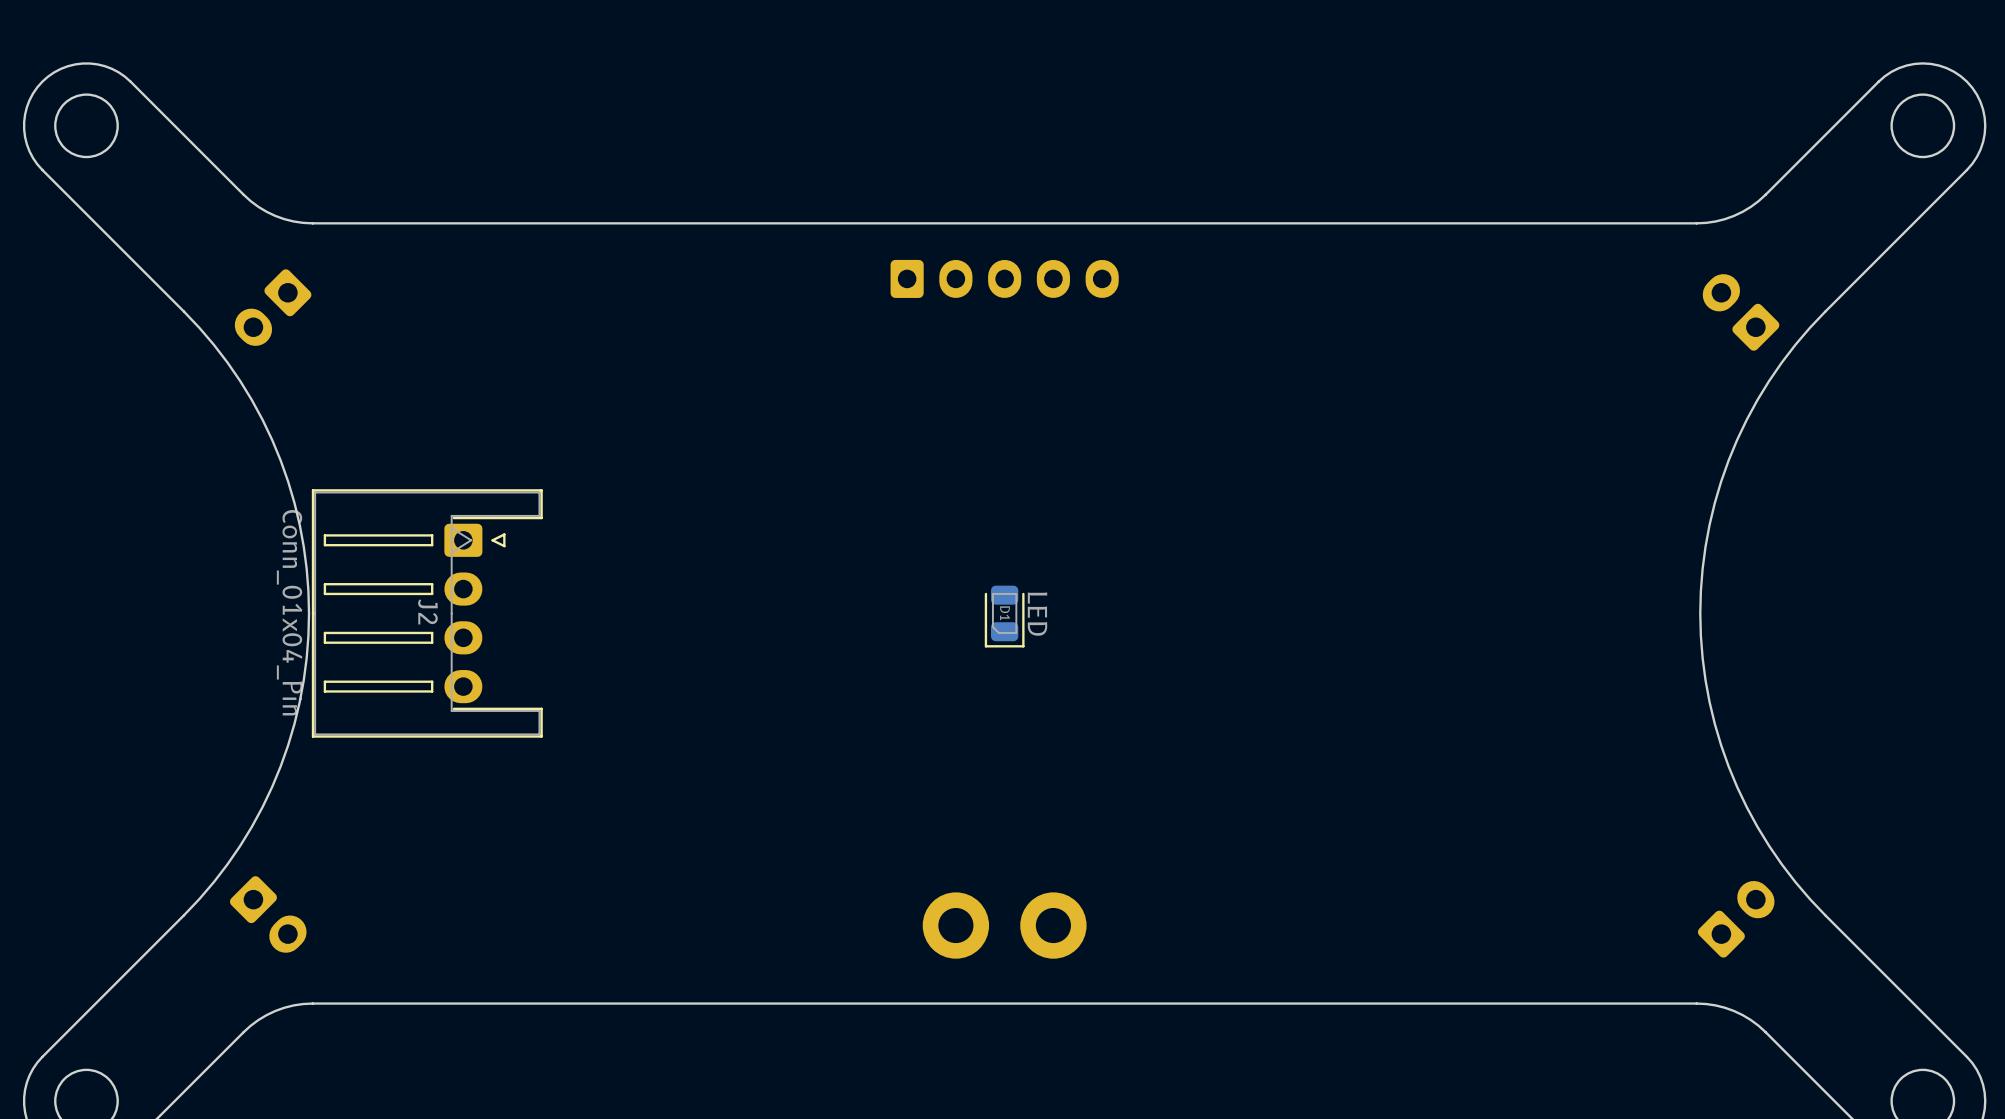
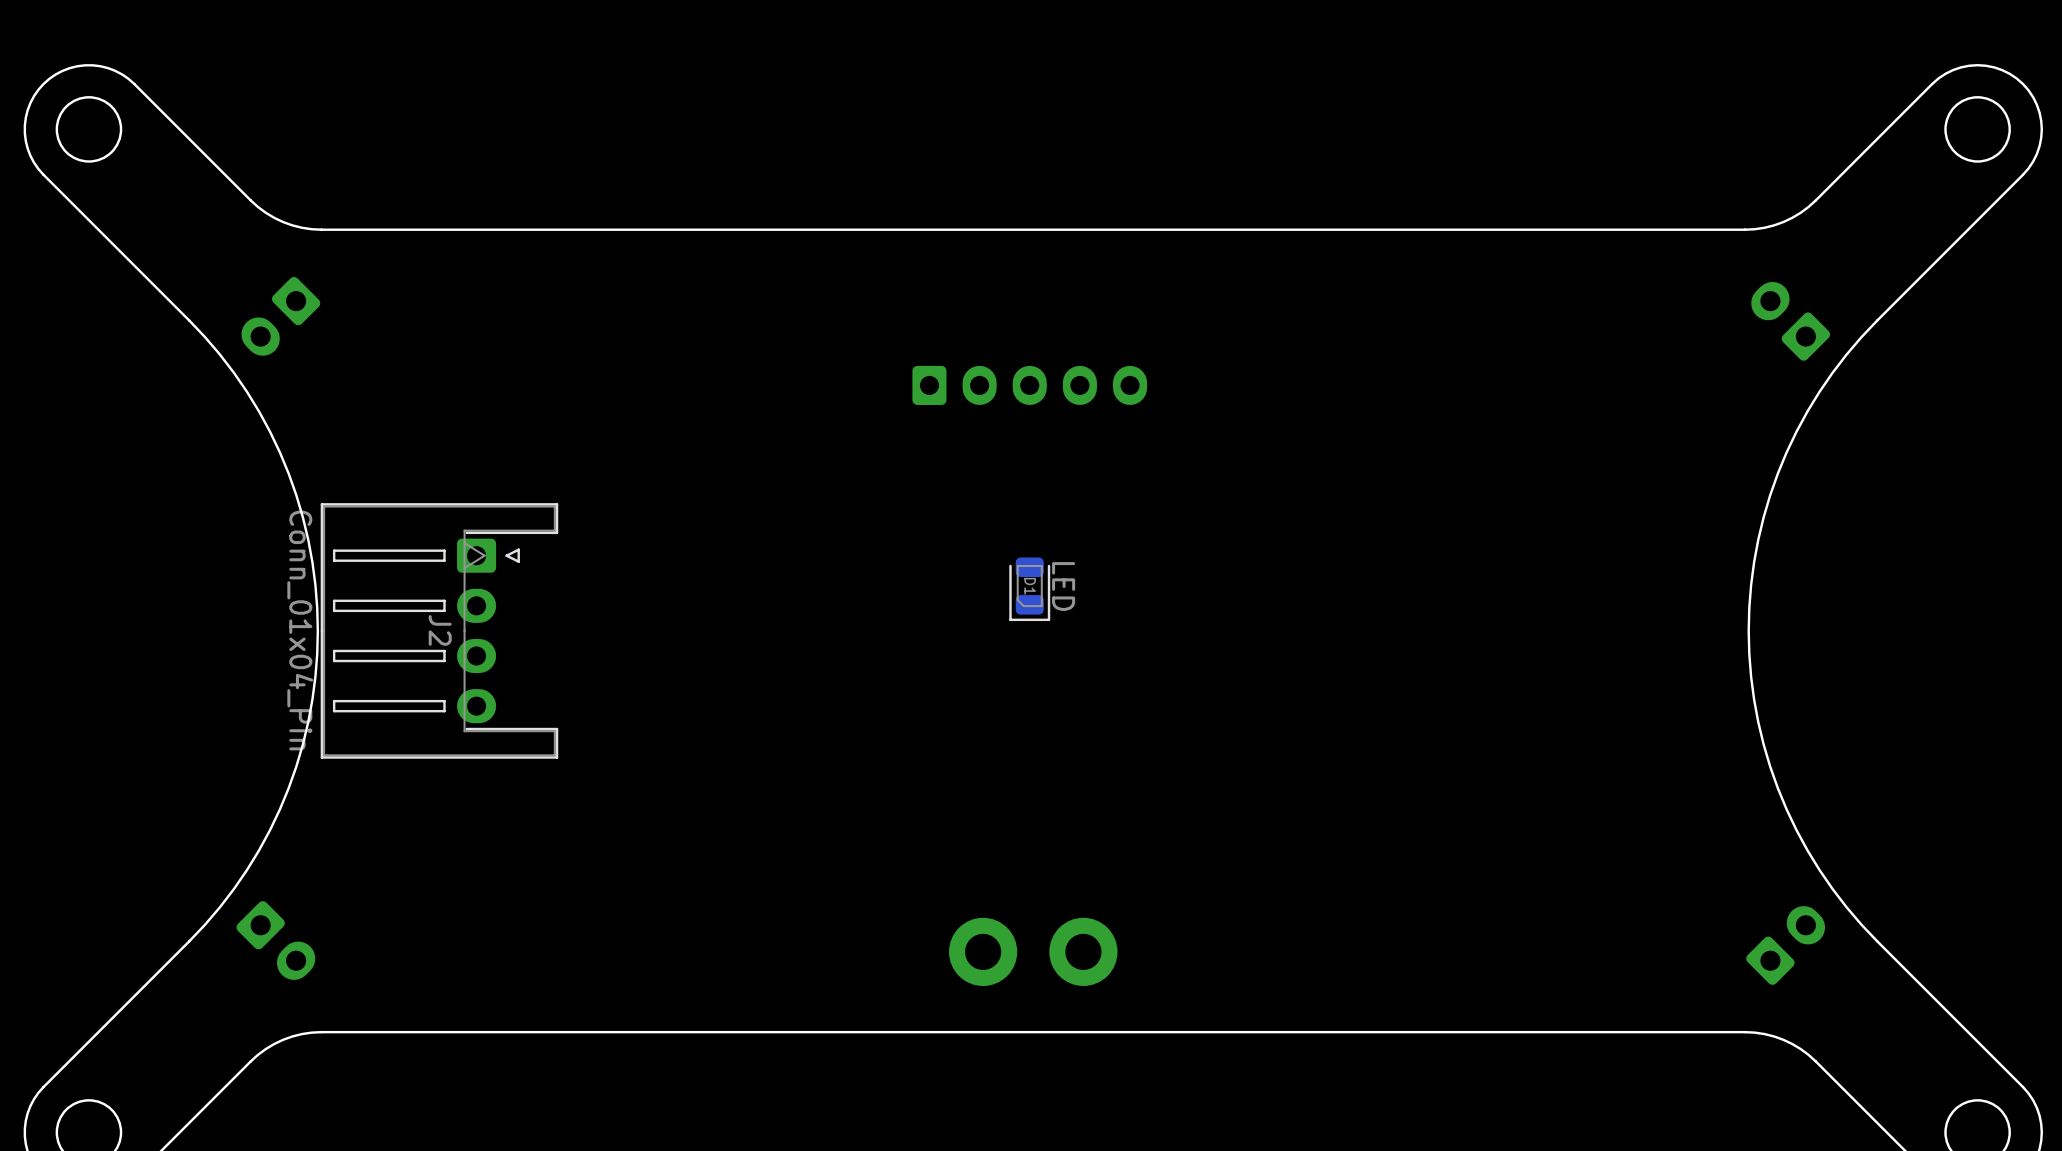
part position: (1004, 278) -> (1029, 385)
D1 position: (1004, 616) -> (1029, 589)

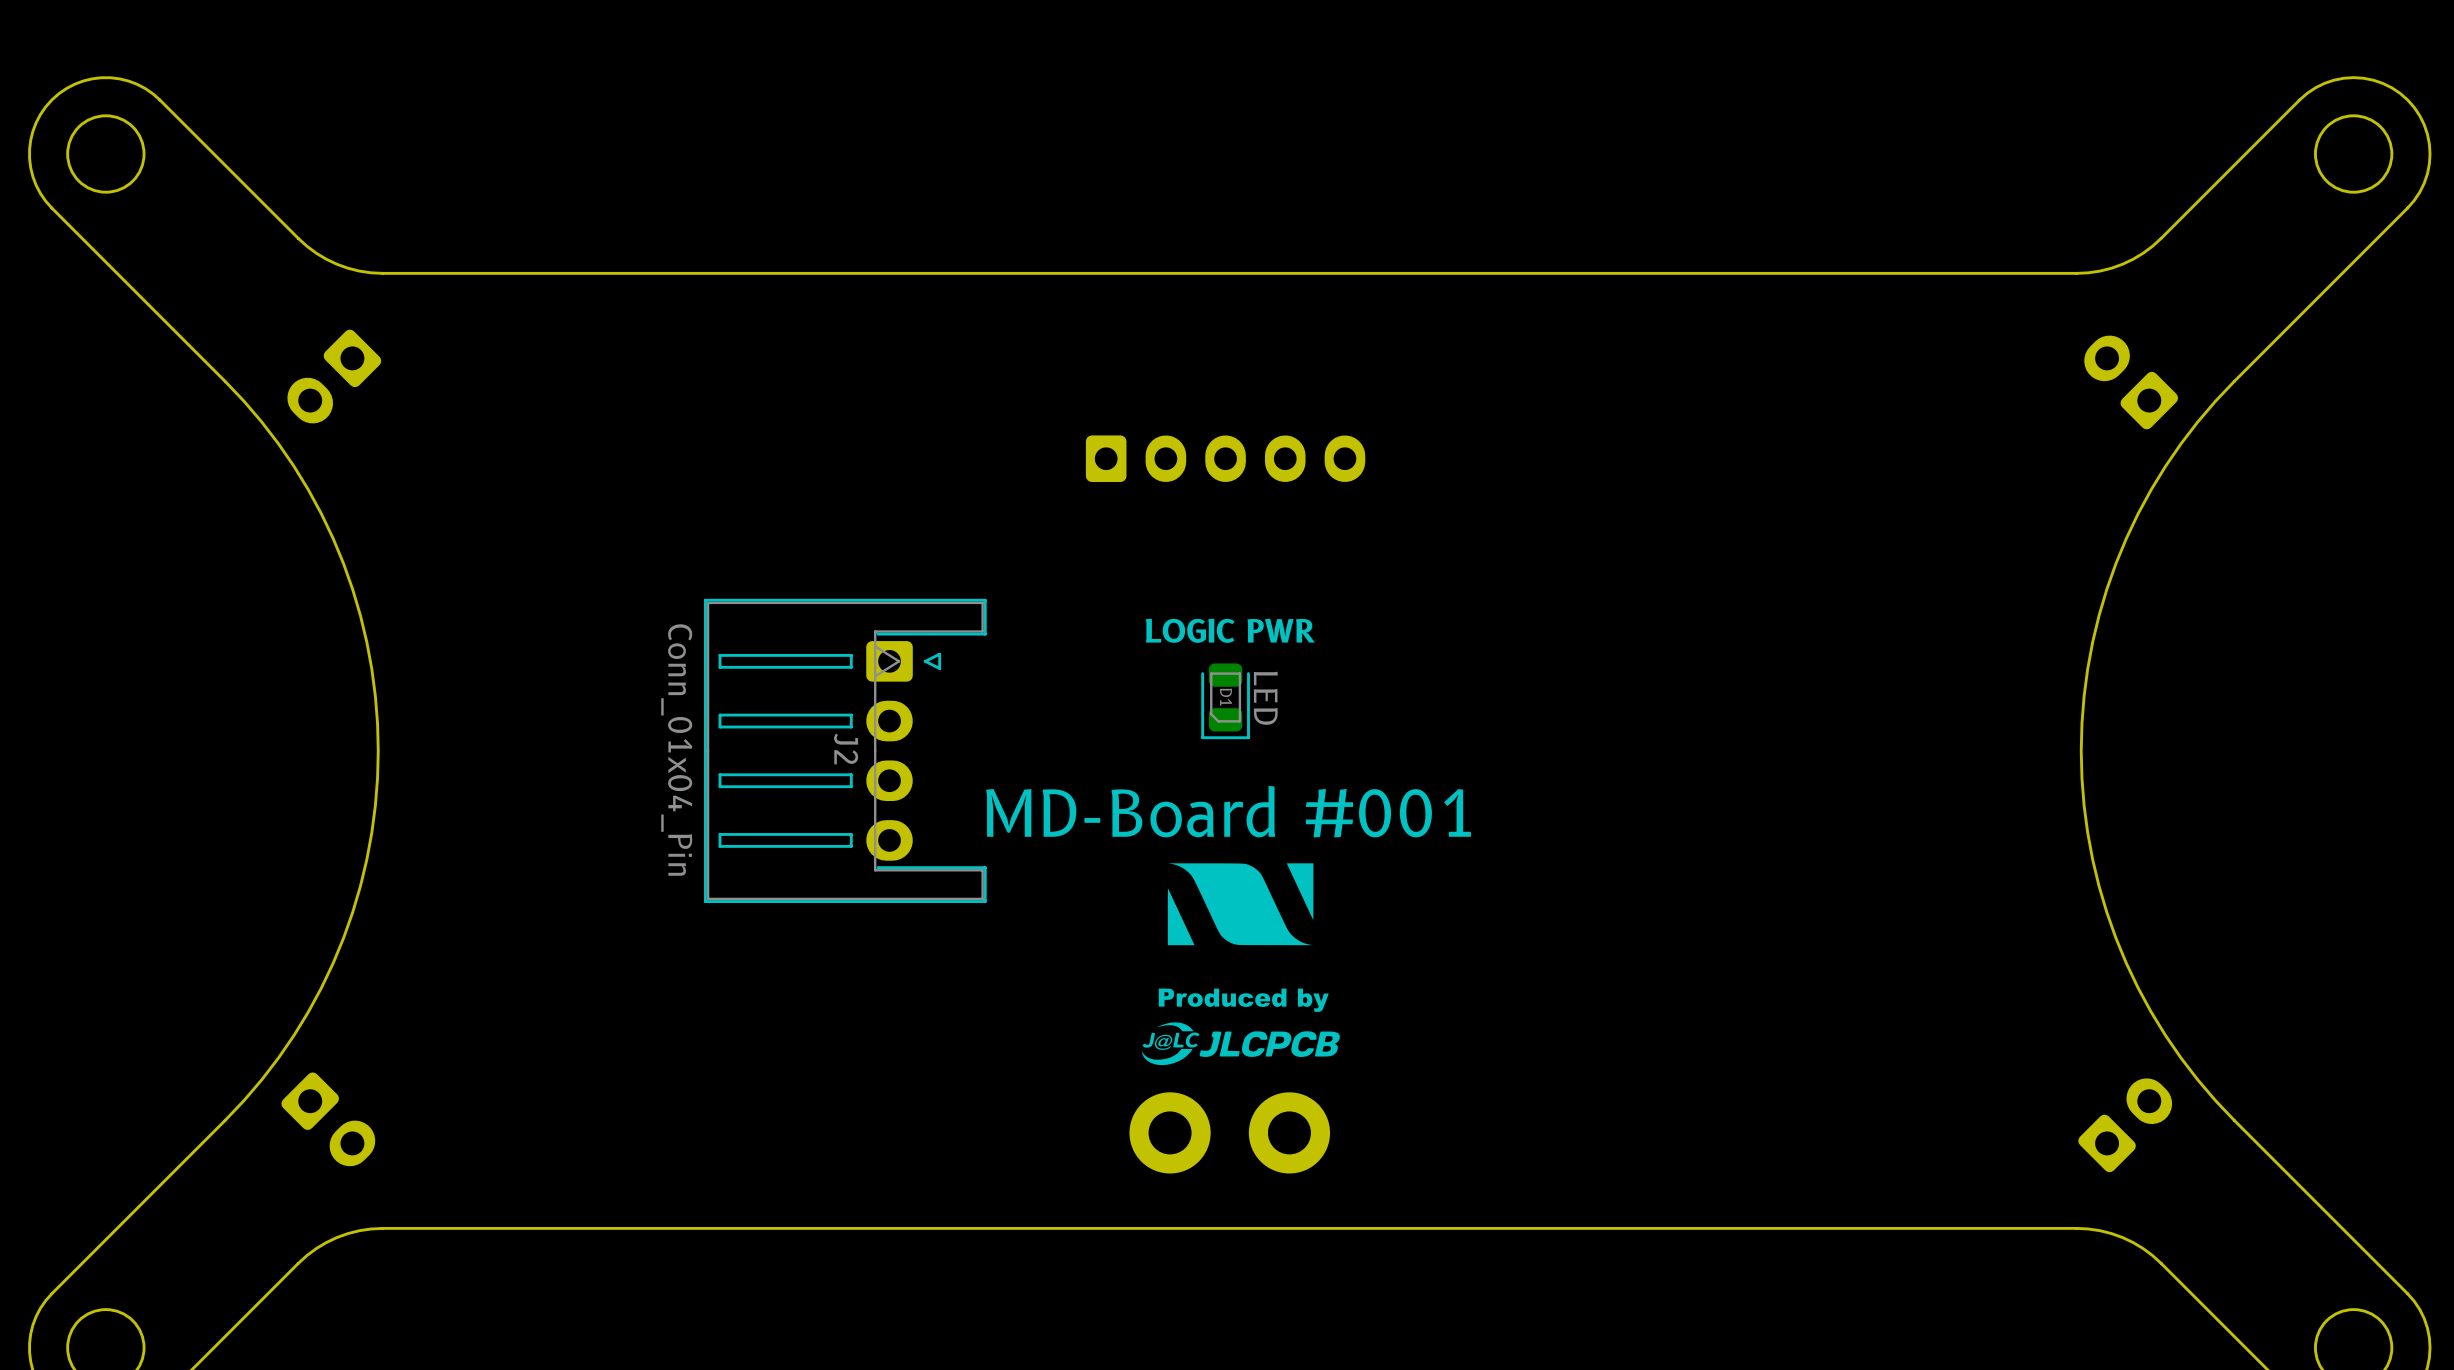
text: none -> LOGIC PWR (1230, 630)
J2 position: (439, 630) -> (845, 750)
text: none -> MD-Board #001 (1228, 811)
drawing: none -> [1167, 863, 1314, 946]
drawing: none -> [1141, 988, 1340, 1066]

